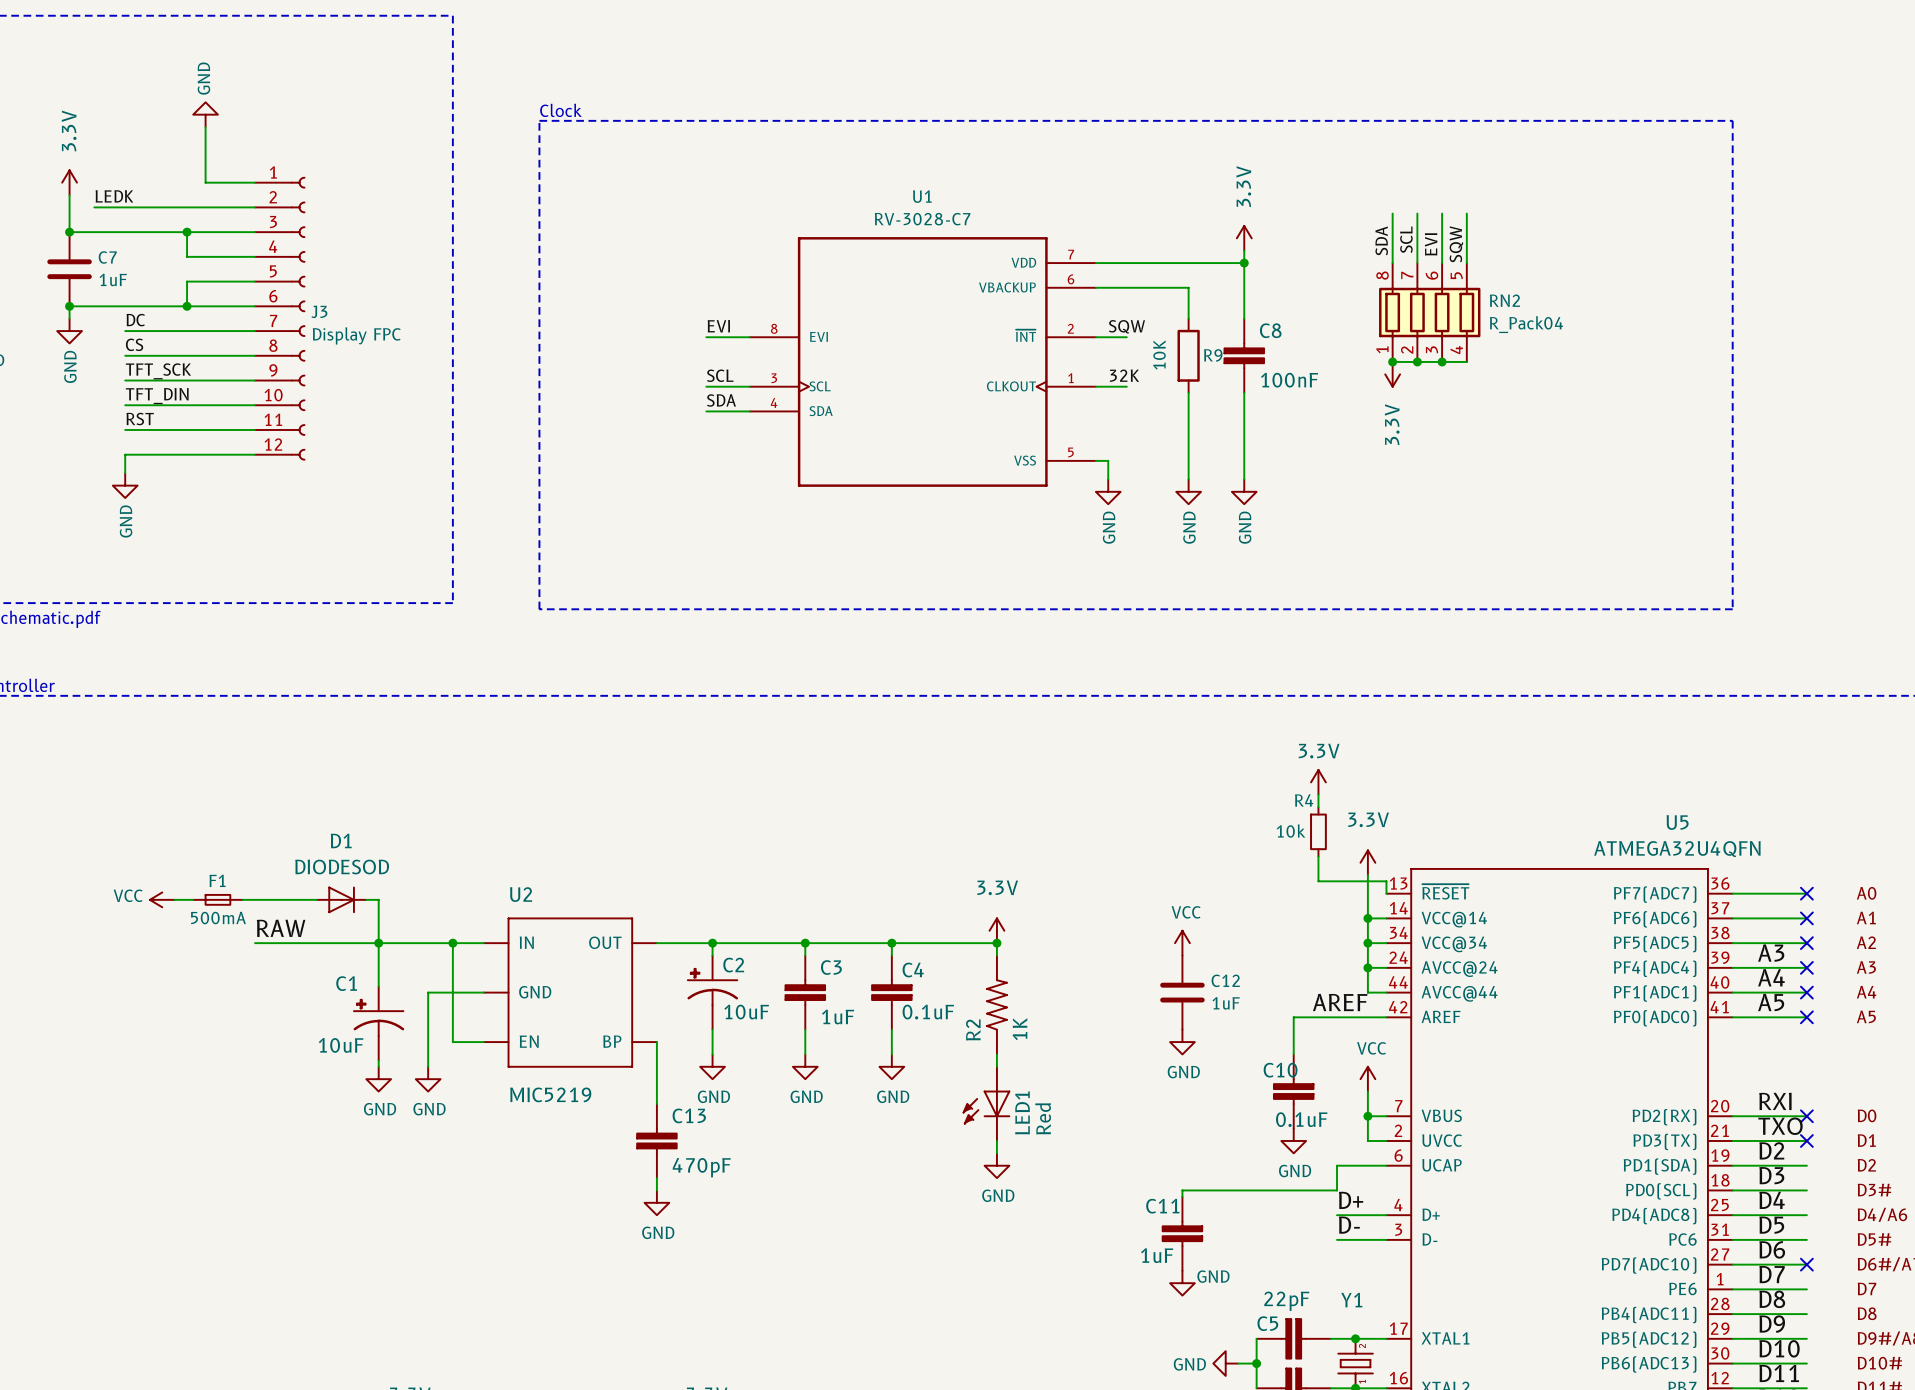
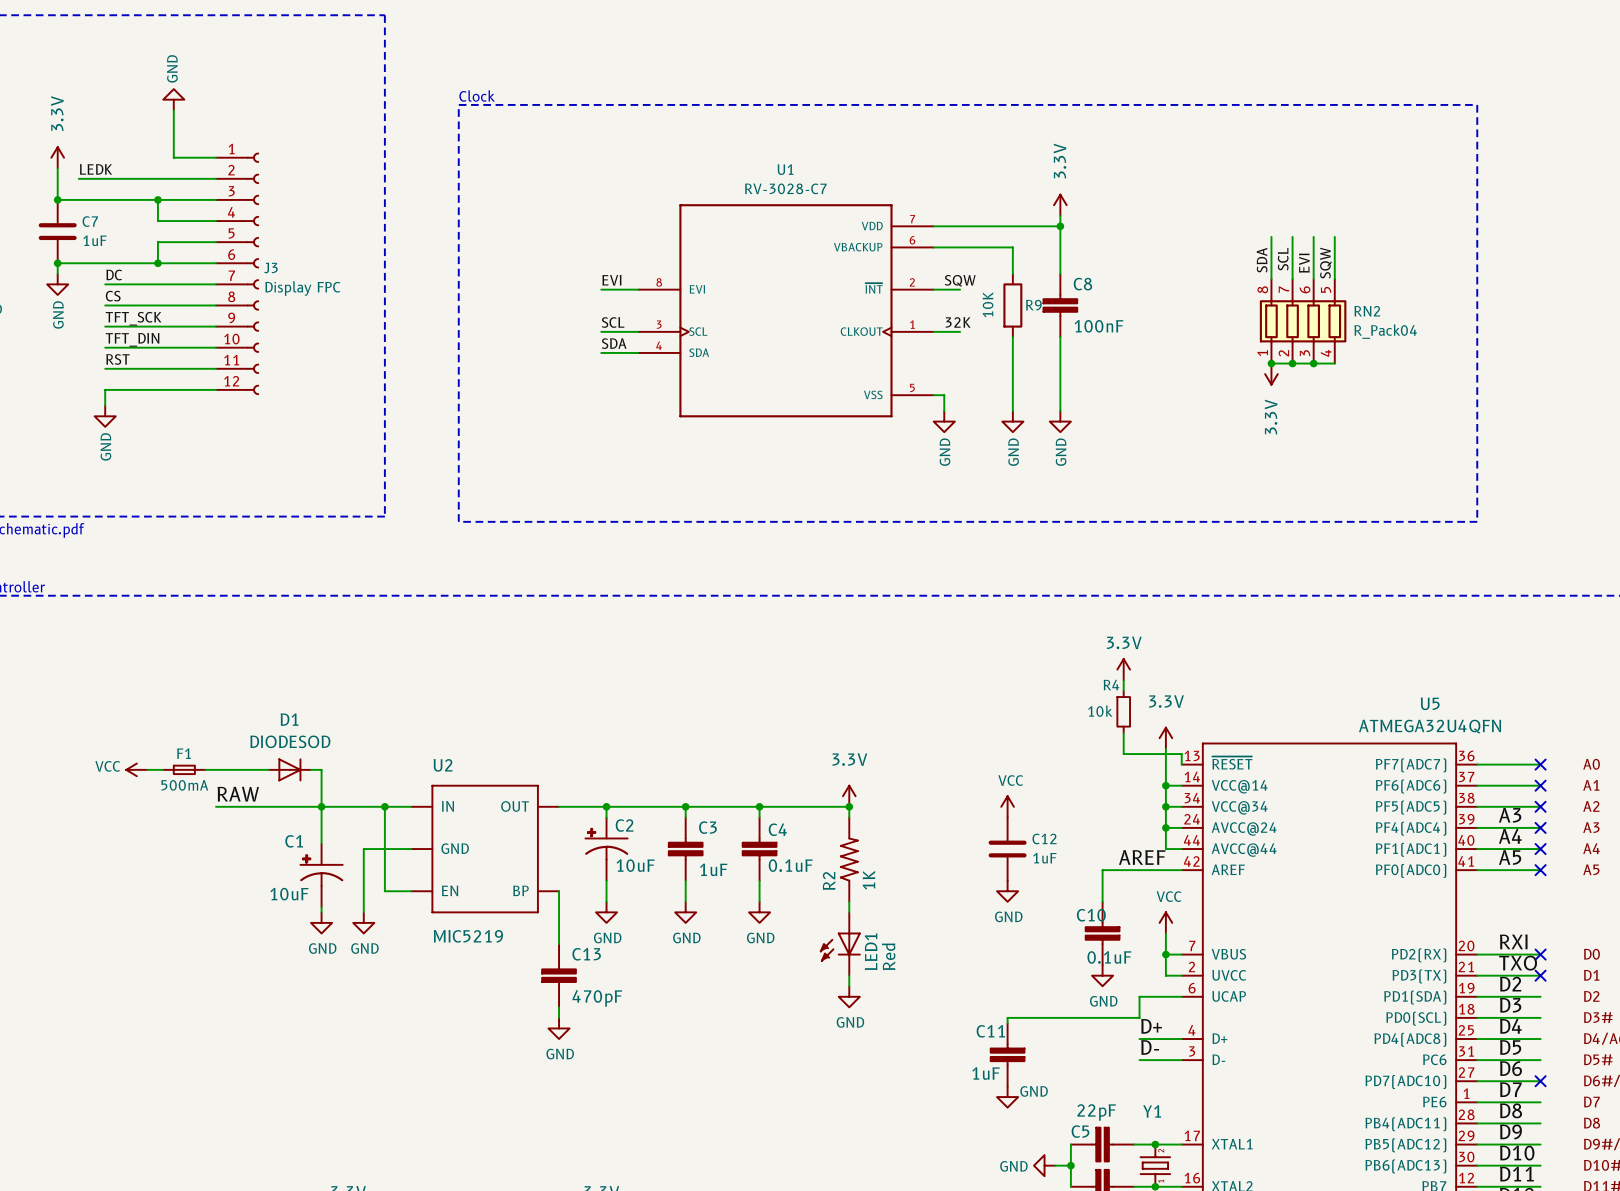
wire: (1392, 213) (1392, 263) -> (1271, 236) (1271, 279)
wire: (1417, 213) (1417, 263) -> (1292, 236) (1292, 279)
wire: (1442, 213) (1442, 263) -> (1313, 236) (1313, 279)
wire: (1466, 213) (1466, 263) -> (1334, 236) (1334, 279)
label position: SCL (1406, 239) -> SCL (1283, 259)
label position: SDA (1381, 240) -> SDA (1262, 260)
label position: EVI (1431, 244) -> EVI (1304, 263)
label position: SQW (1456, 244) -> SQW (1325, 263)
RN2 position: (1429, 312) -> (1303, 321)
wire: (1392, 361) (1466, 361) -> (1271, 363) (1334, 363)
junction: (1392, 361) -> none
junction: (1417, 361) -> none
junction: (1442, 361) -> none
power symbol position: 3.3V (1392, 374) -> 3.3V (1271, 374)
junction: none -> (1271, 363)
junction: none -> (1292, 363)
junction: none -> (1313, 363)

